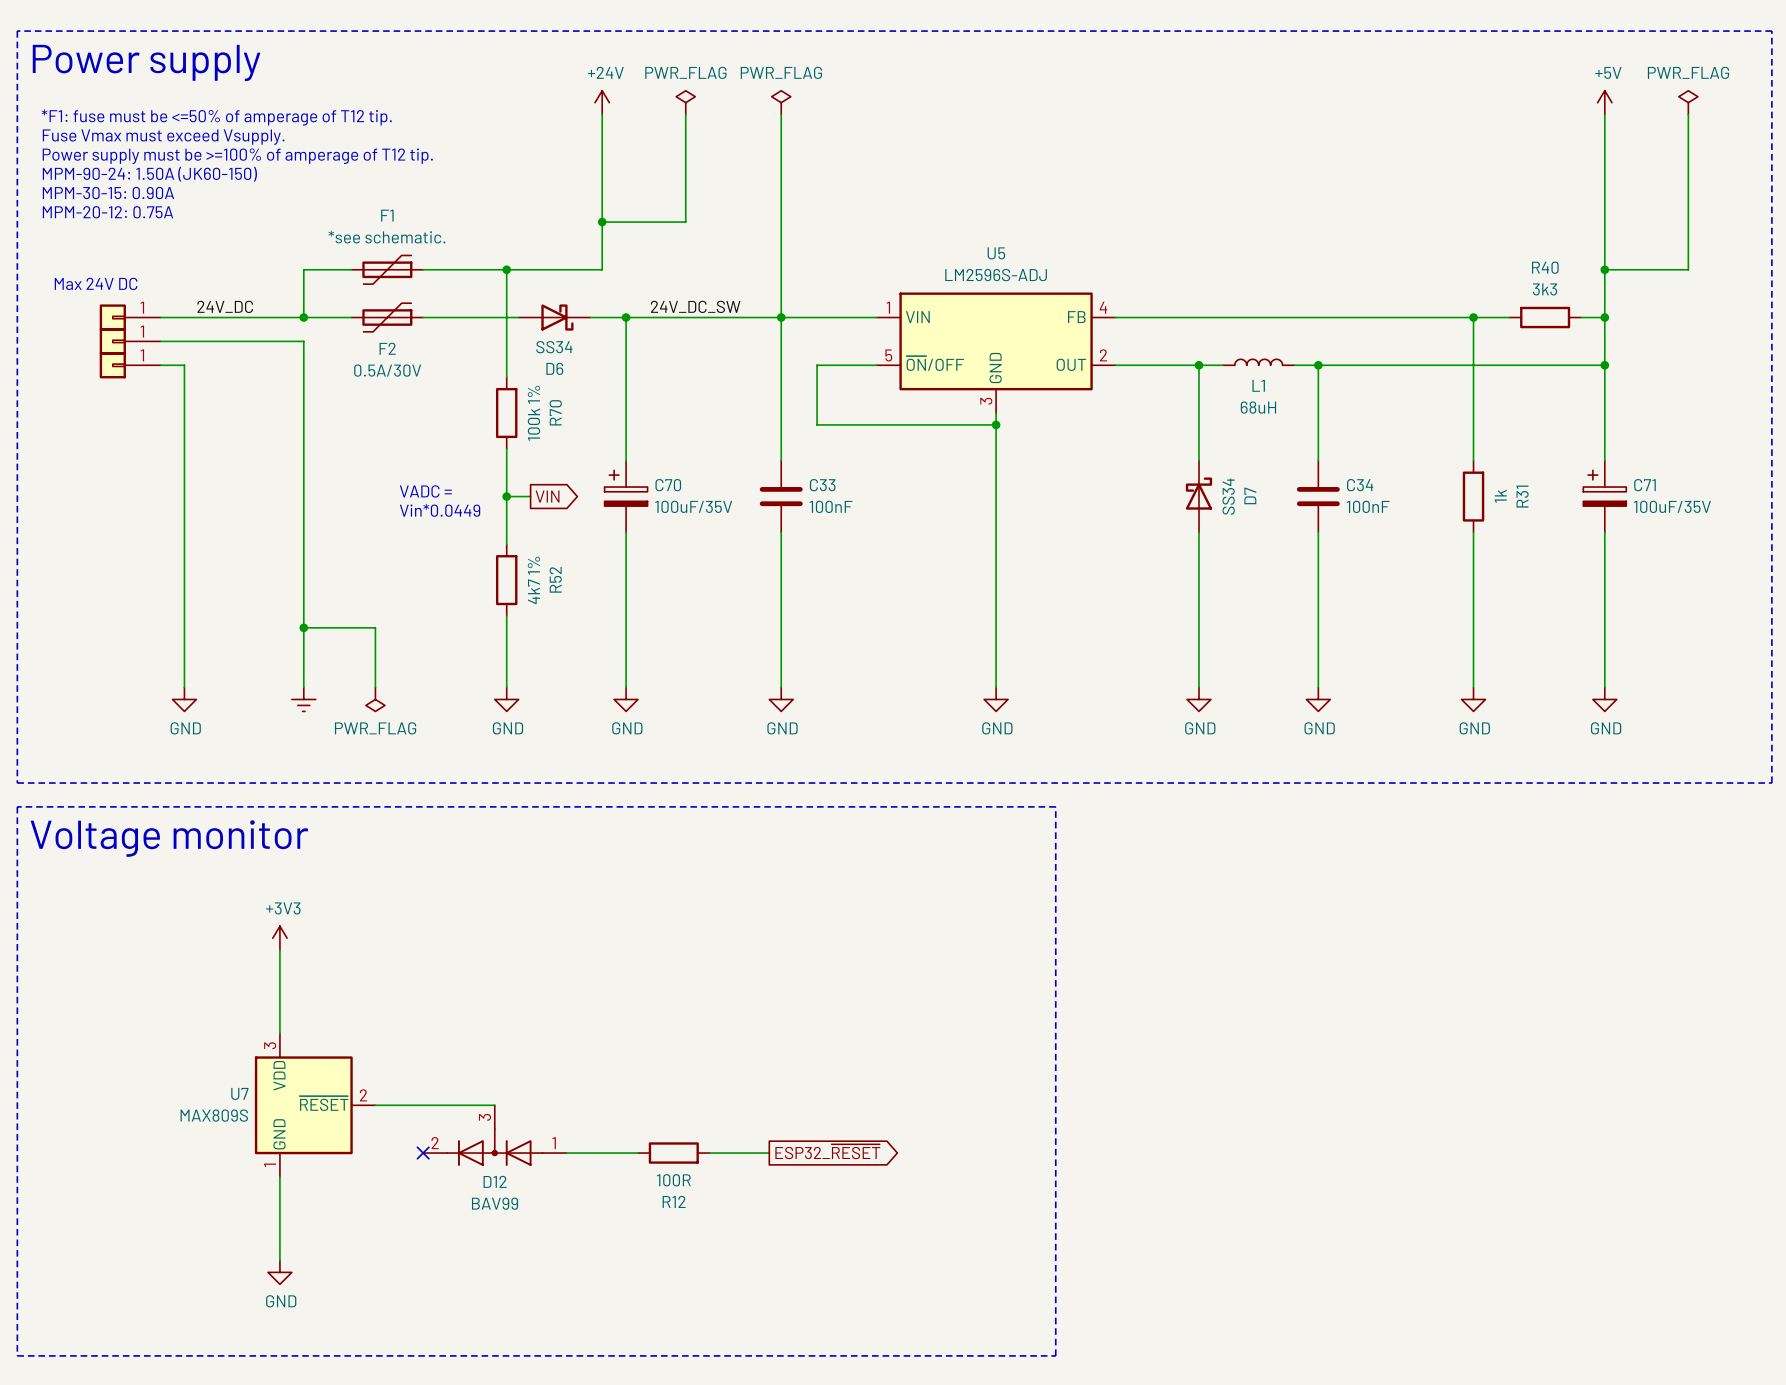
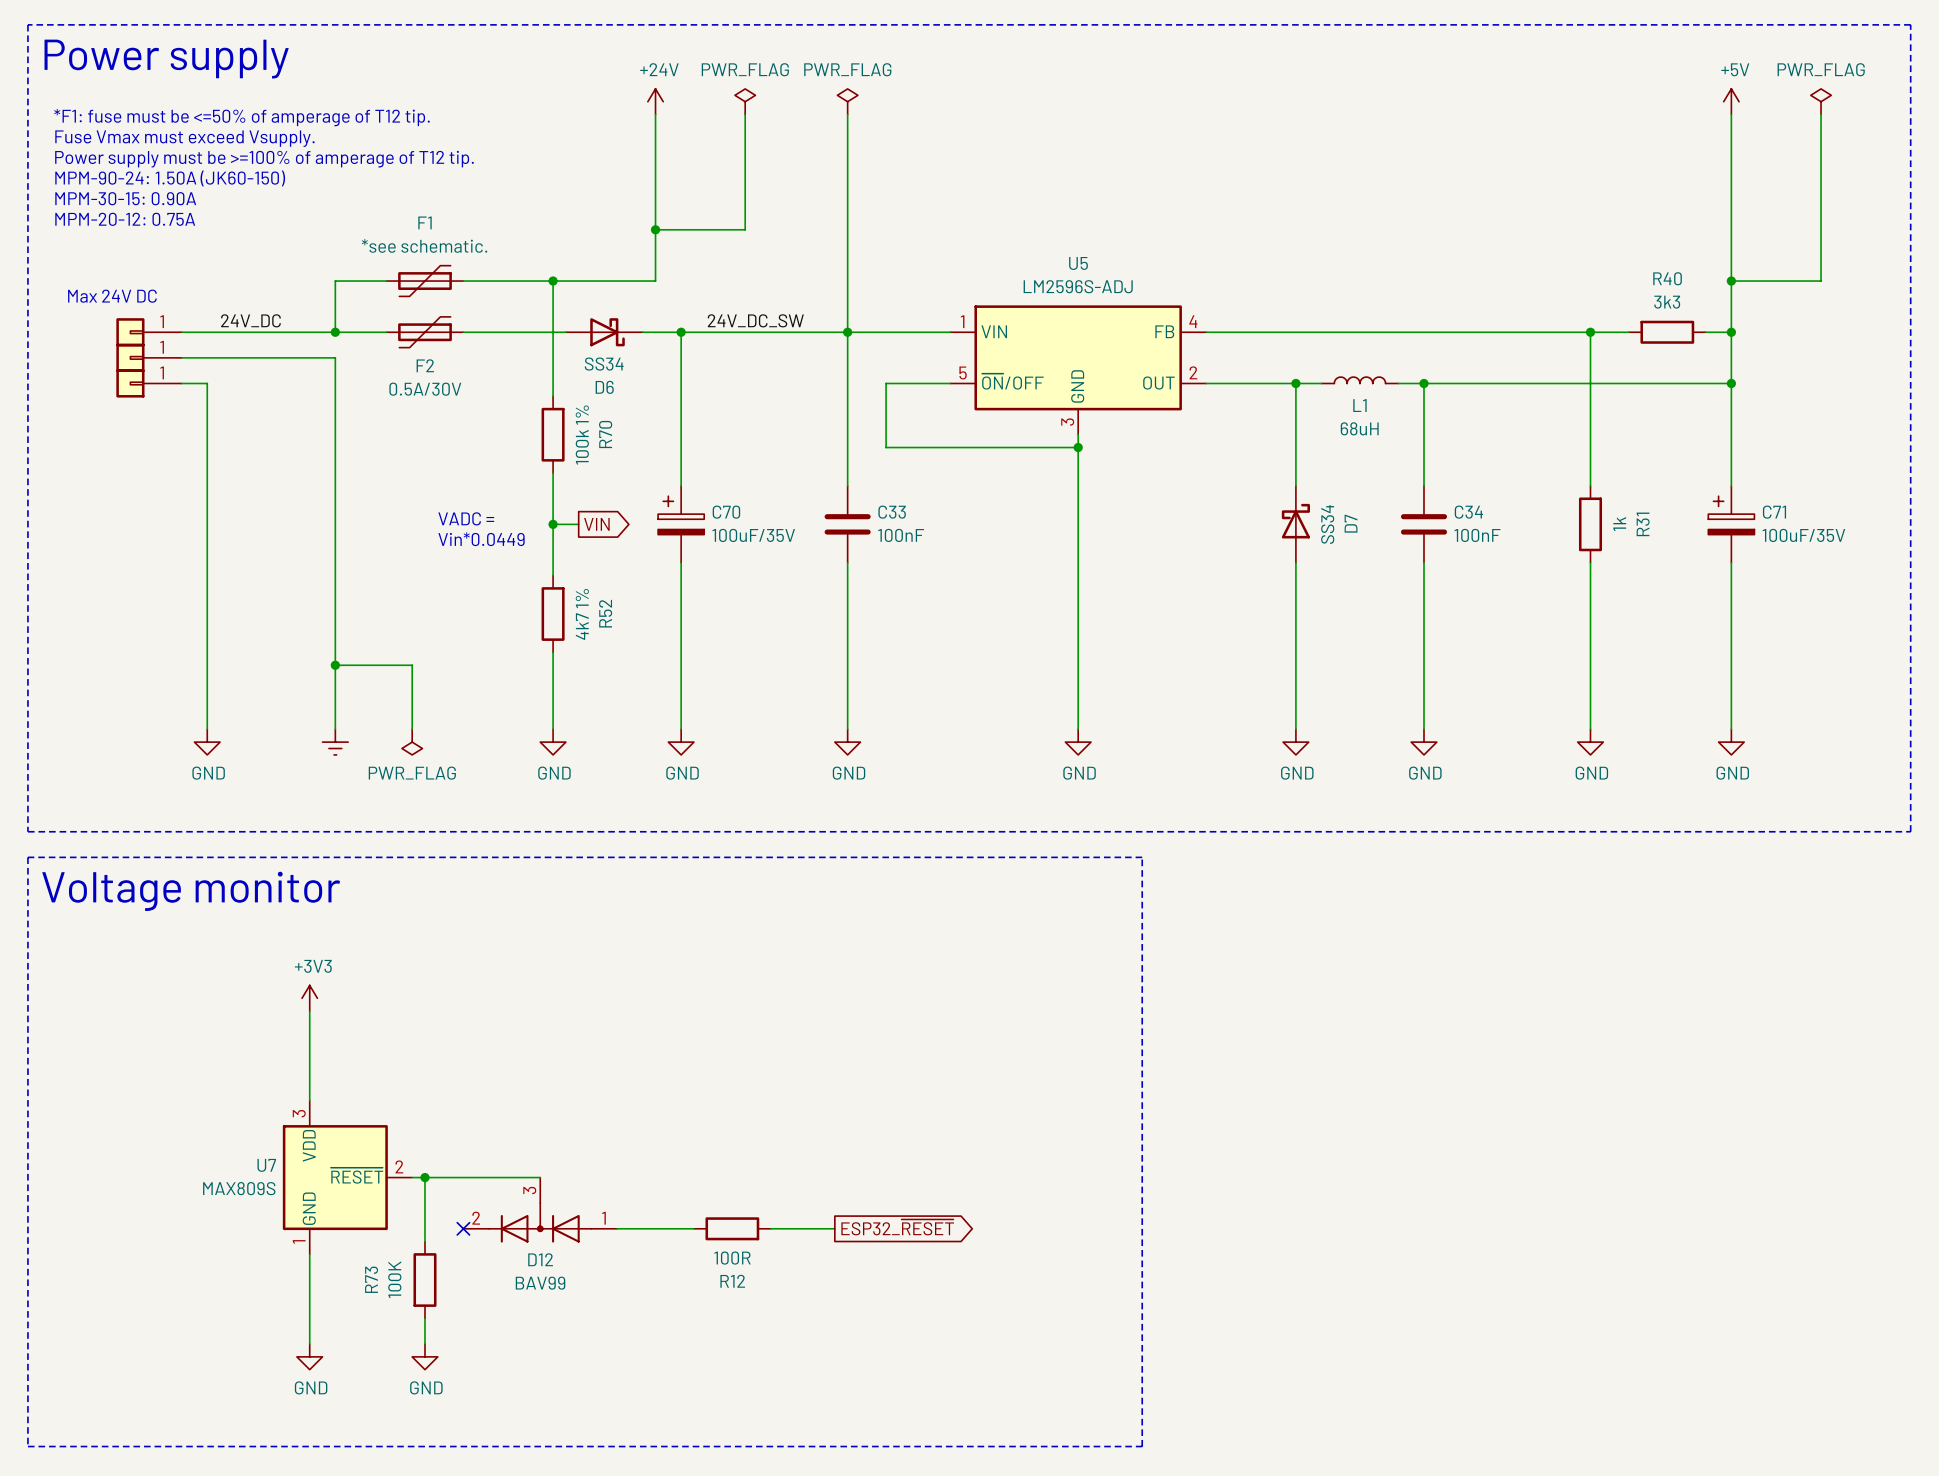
wire: none -> (424, 1177) (424, 1241)
junction: none -> (424, 1177)
R73: none -> 100K (424, 1280)
wire: none -> (424, 1318) (424, 1344)
power symbol: none -> GND (424, 1356)

